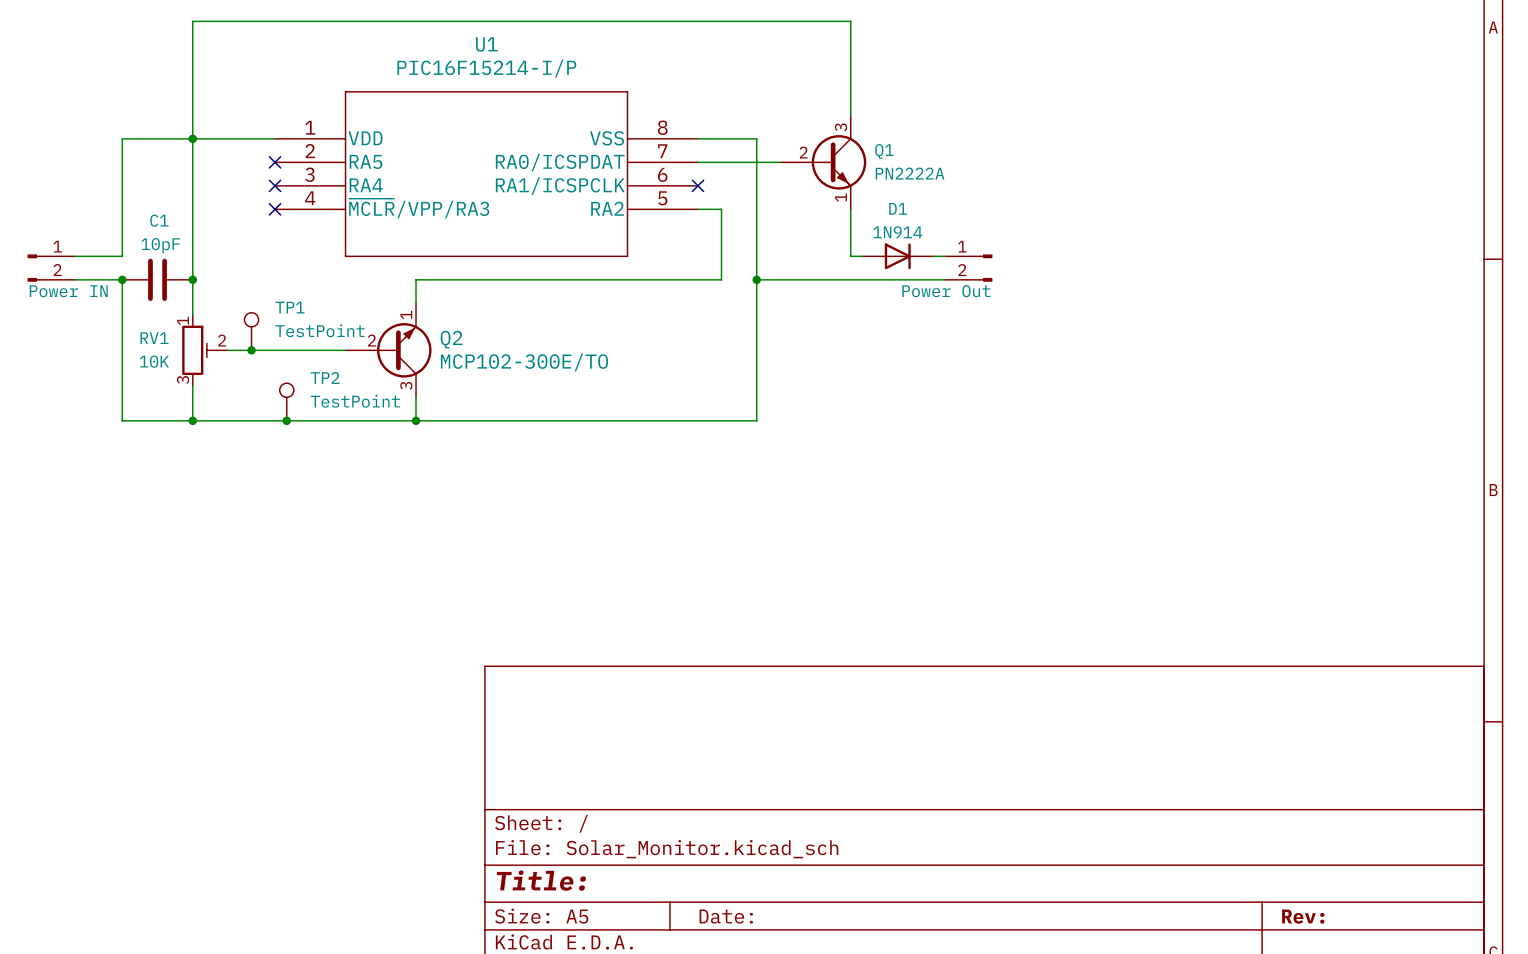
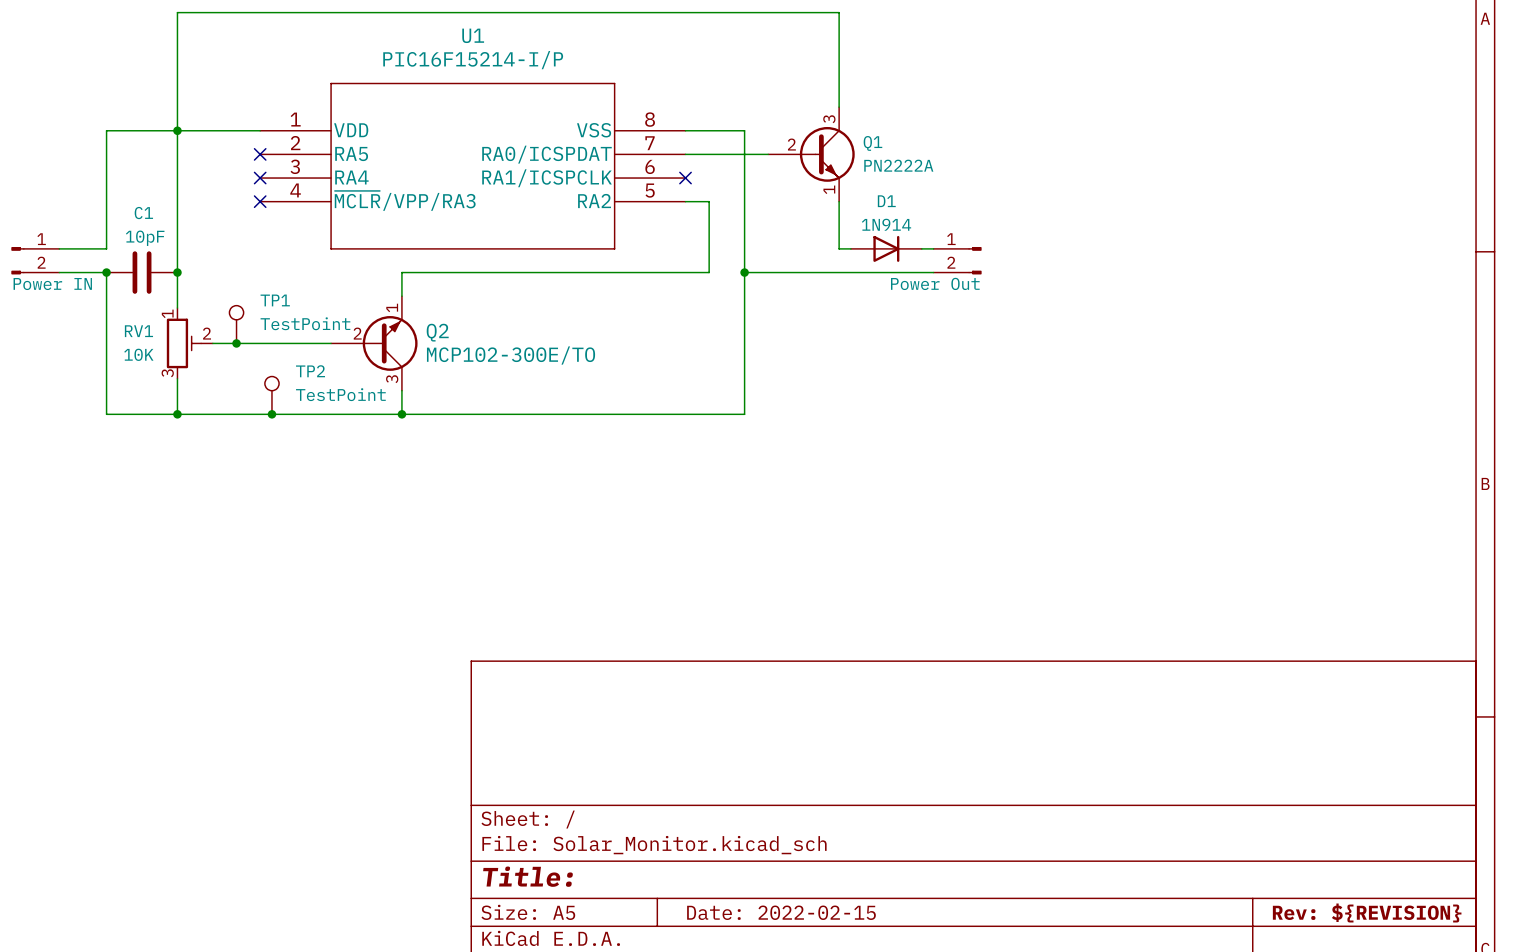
title block: Date: (726, 916) -> Date: 2022-02-15 (781, 912)
title block: Rev: (1303, 916) -> Rev: ${REVISION} (1367, 913)

